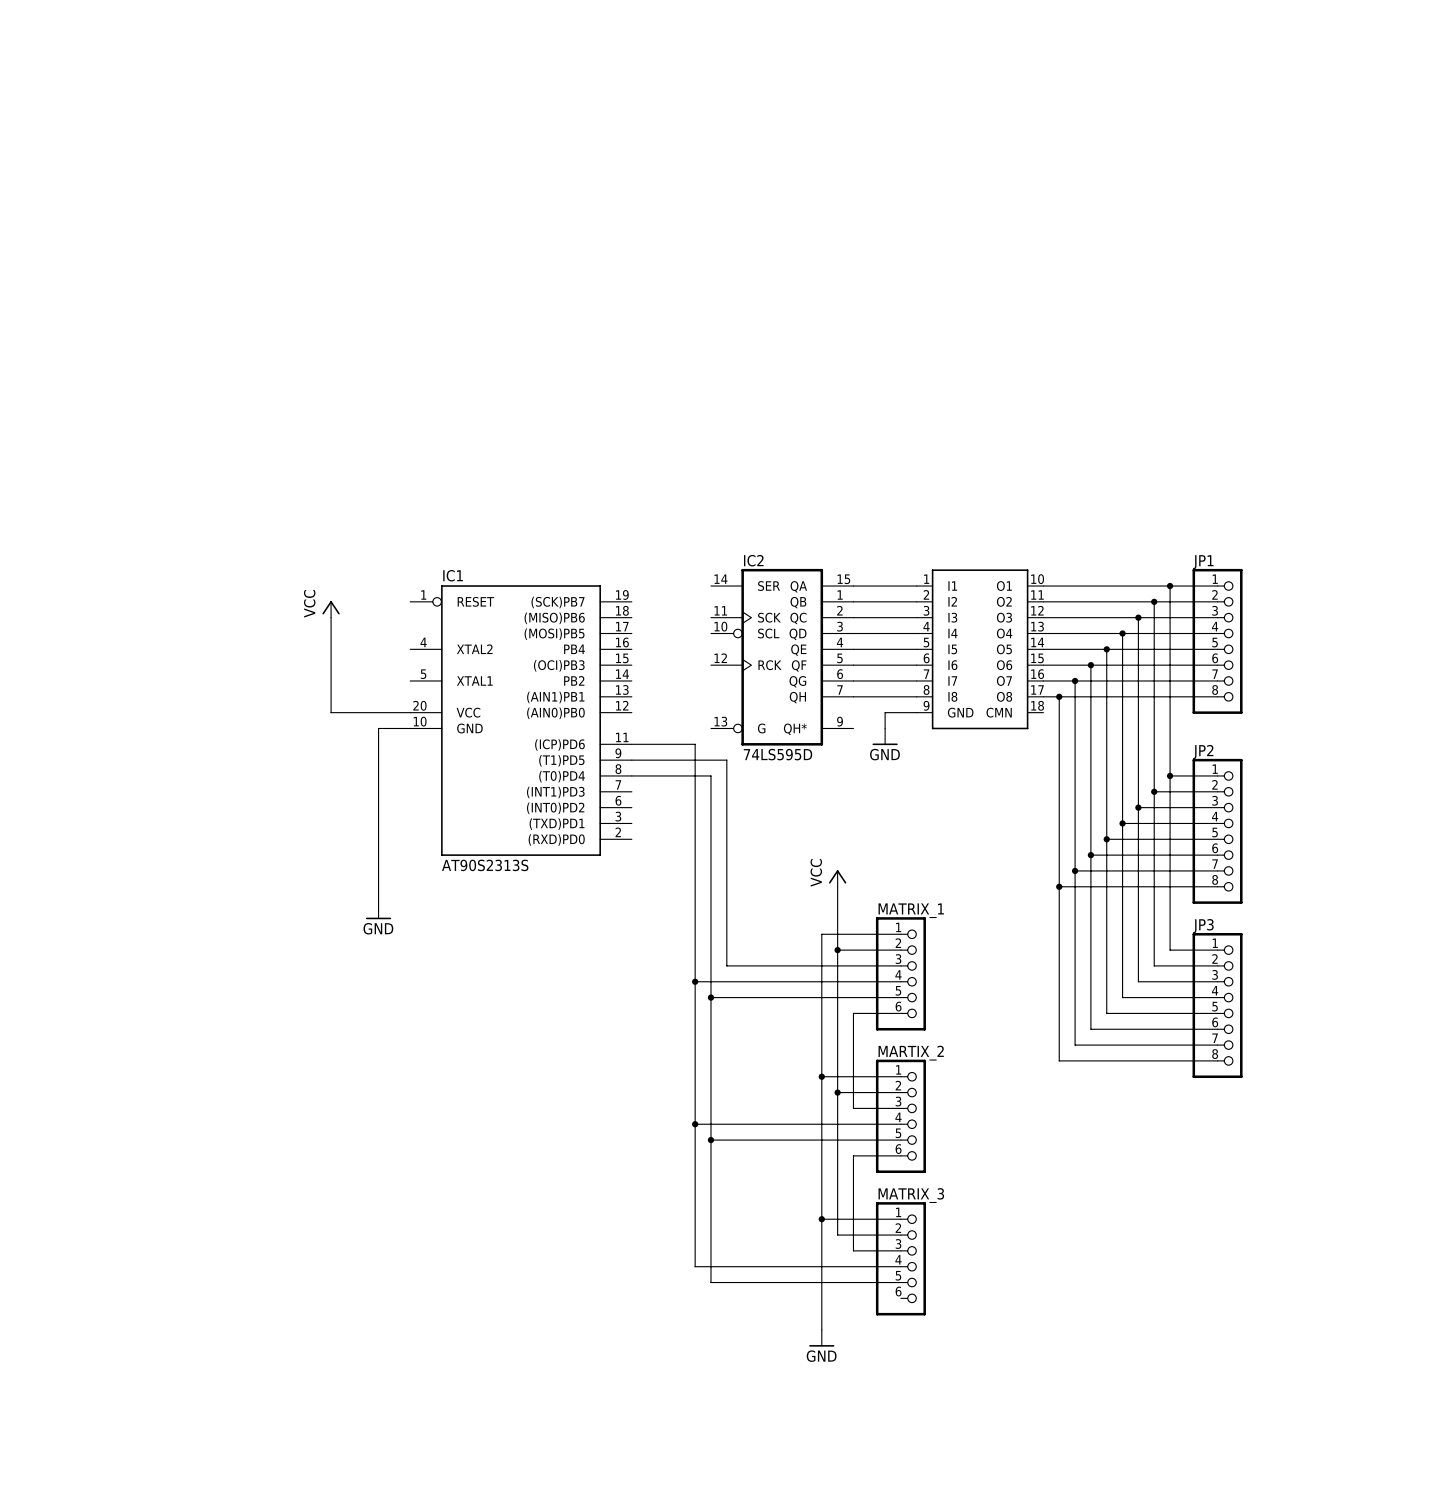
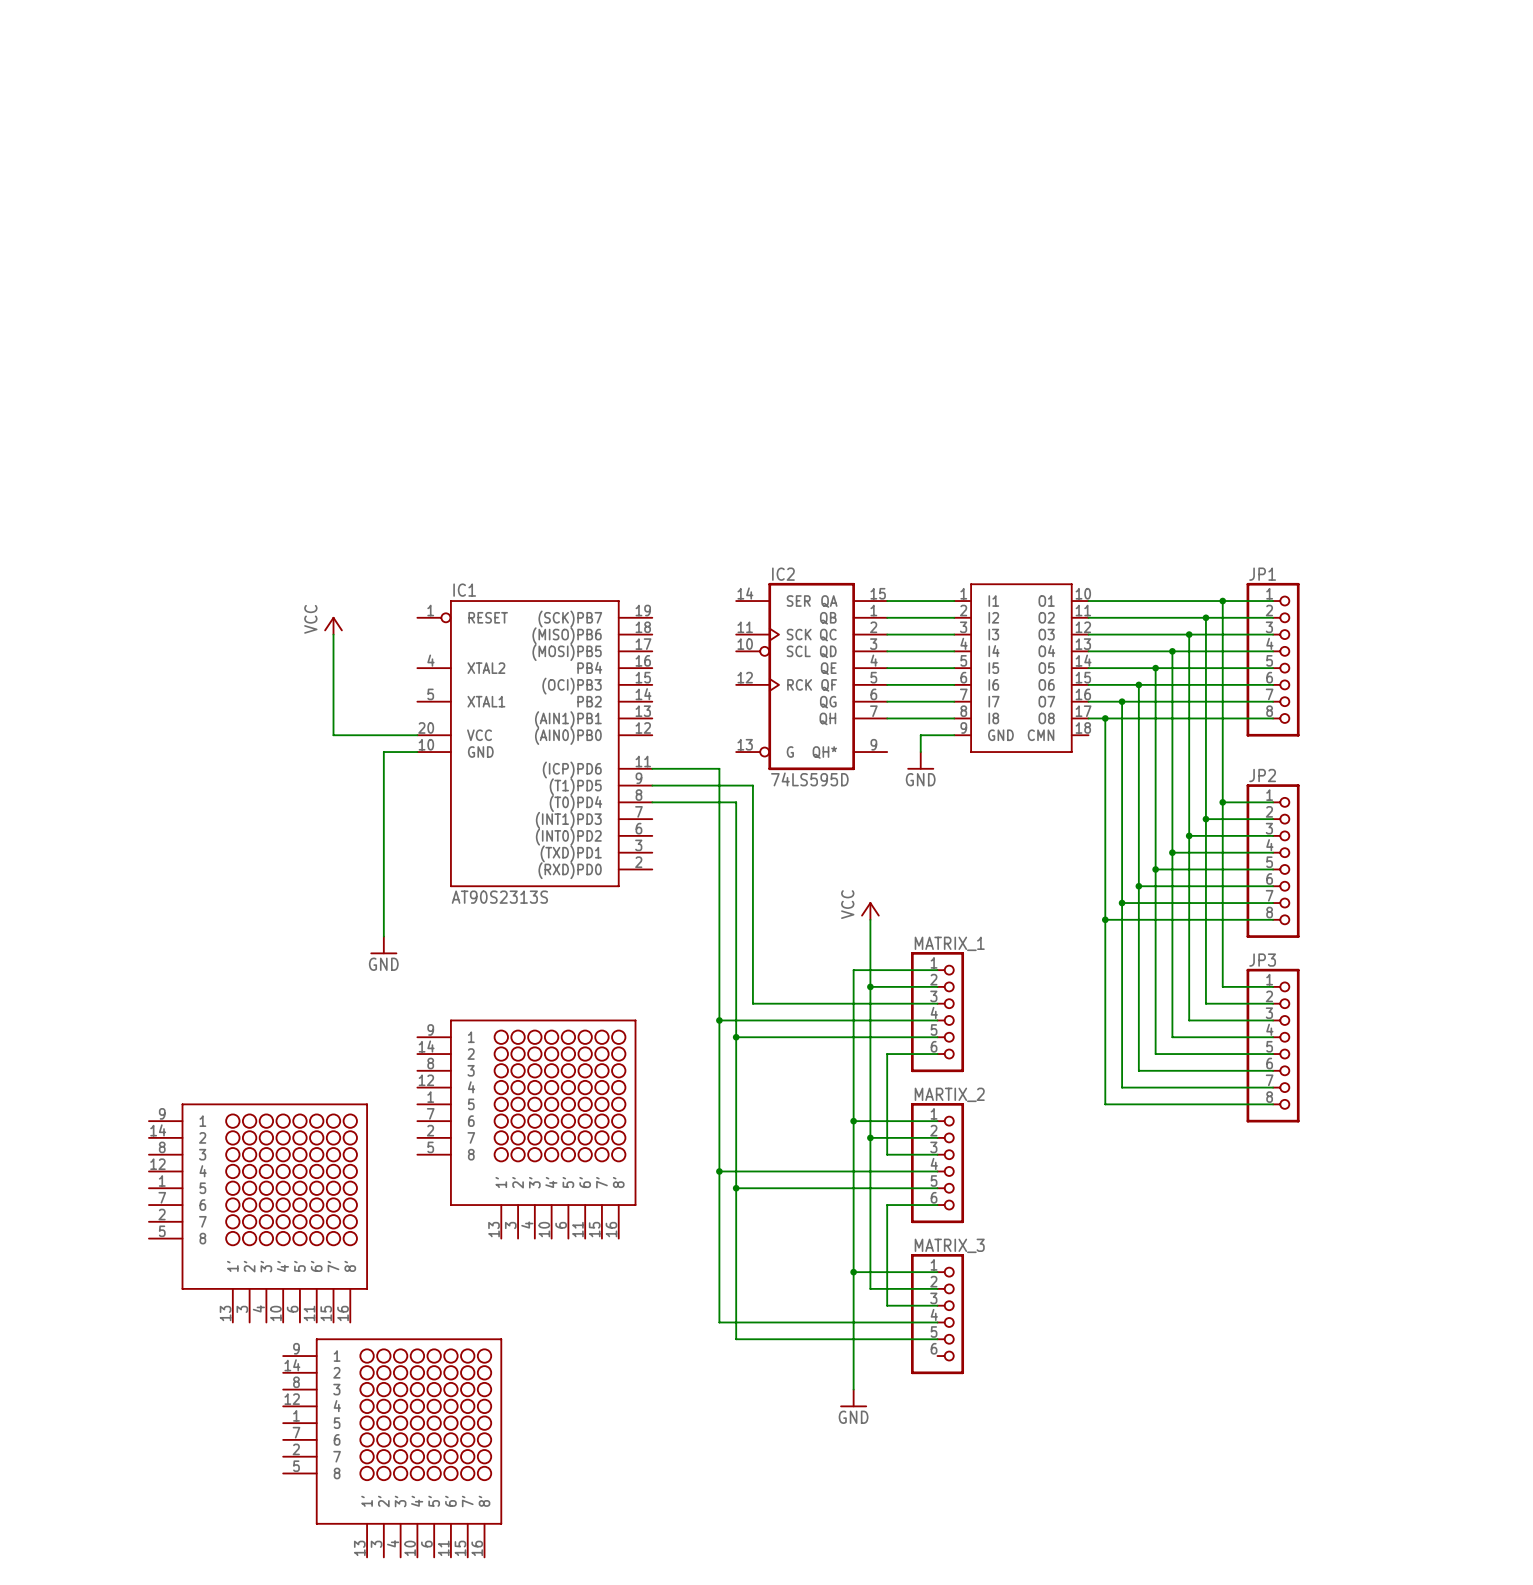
part: none -> (526, 1129)
part: none -> (258, 1213)
part: none -> (392, 1447)

